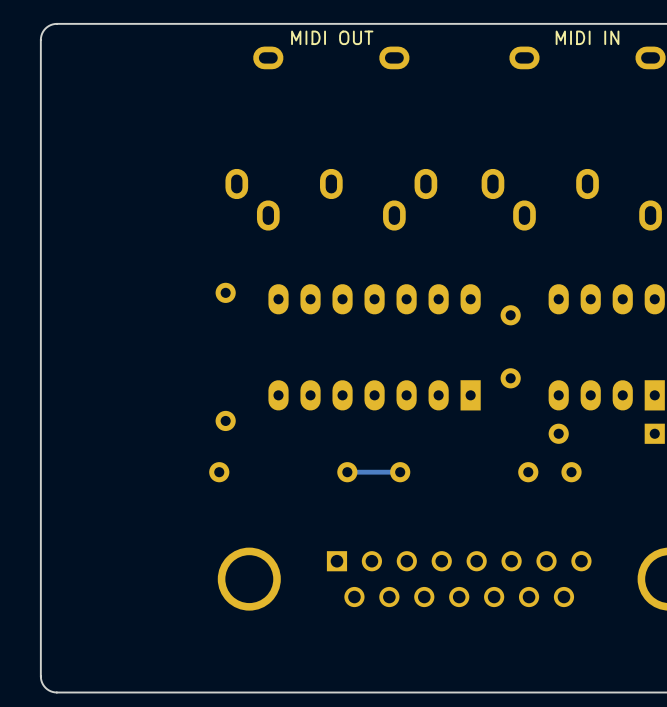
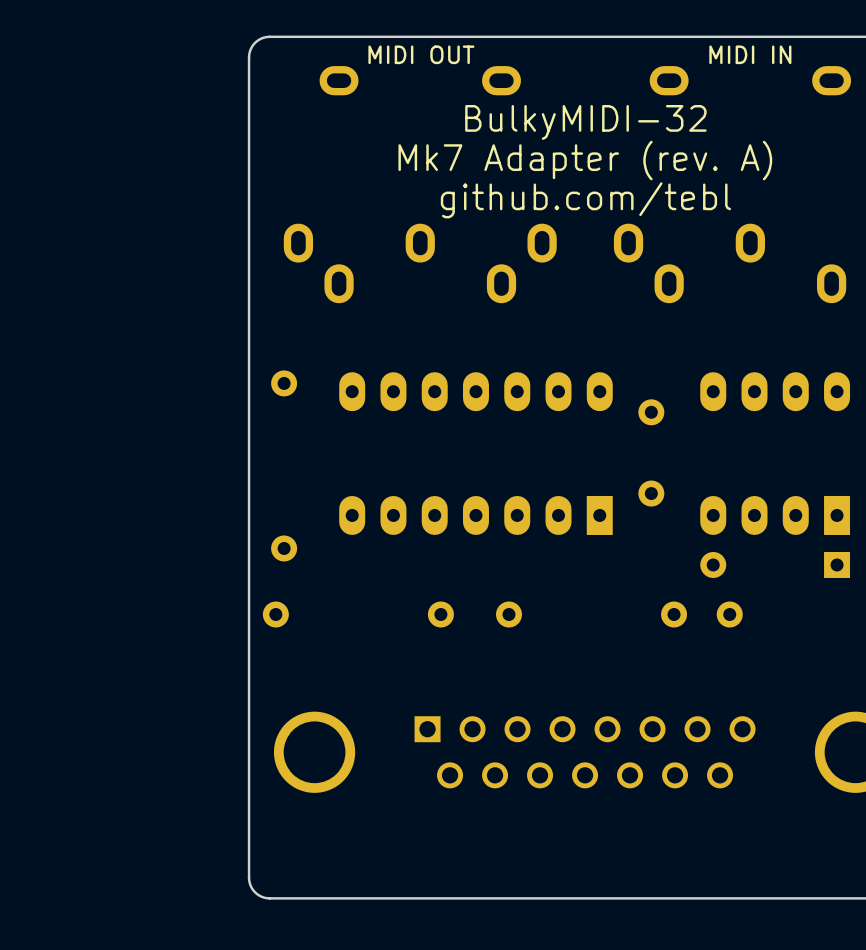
board edge: (214, 23) (54, 24) (45, 28) (41, 35) (40, 676) (45, 687) (54, 692) (214, 692) -> (269, 36) (261, 38) (255, 42) (250, 49) (249, 57) (249, 877) (250, 885) (255, 892) (261, 896) (269, 898)
text: none -> BulkyMIDI-32 (585, 122)
text: none -> Mk7 Adapter (rev. A) (585, 160)
text: none -> github.com/tebl (585, 200)
track: (400, 472) (347, 472) -> none

